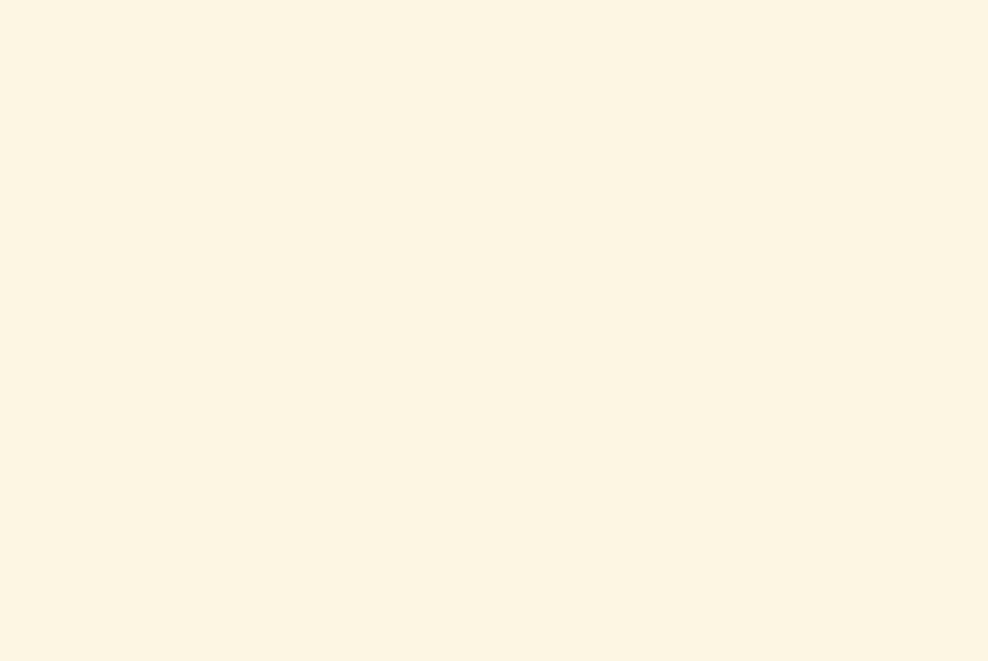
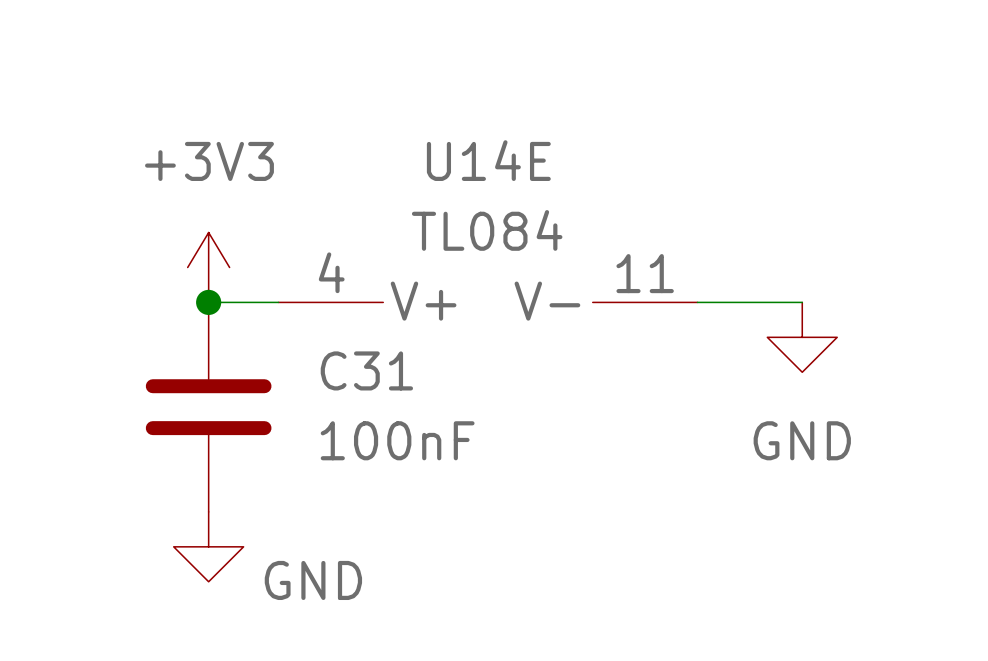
power symbol: none -> +3V3 (208, 267)
wire: none -> (208, 302) (278, 302)
junction: none -> (208, 302)
U14E: none -> TL084 (488, 302)
wire: none -> (697, 302) (802, 302)
power symbol: none -> GND (802, 337)
C31: none -> 100nF (208, 407)
power symbol: none -> GND (208, 546)

